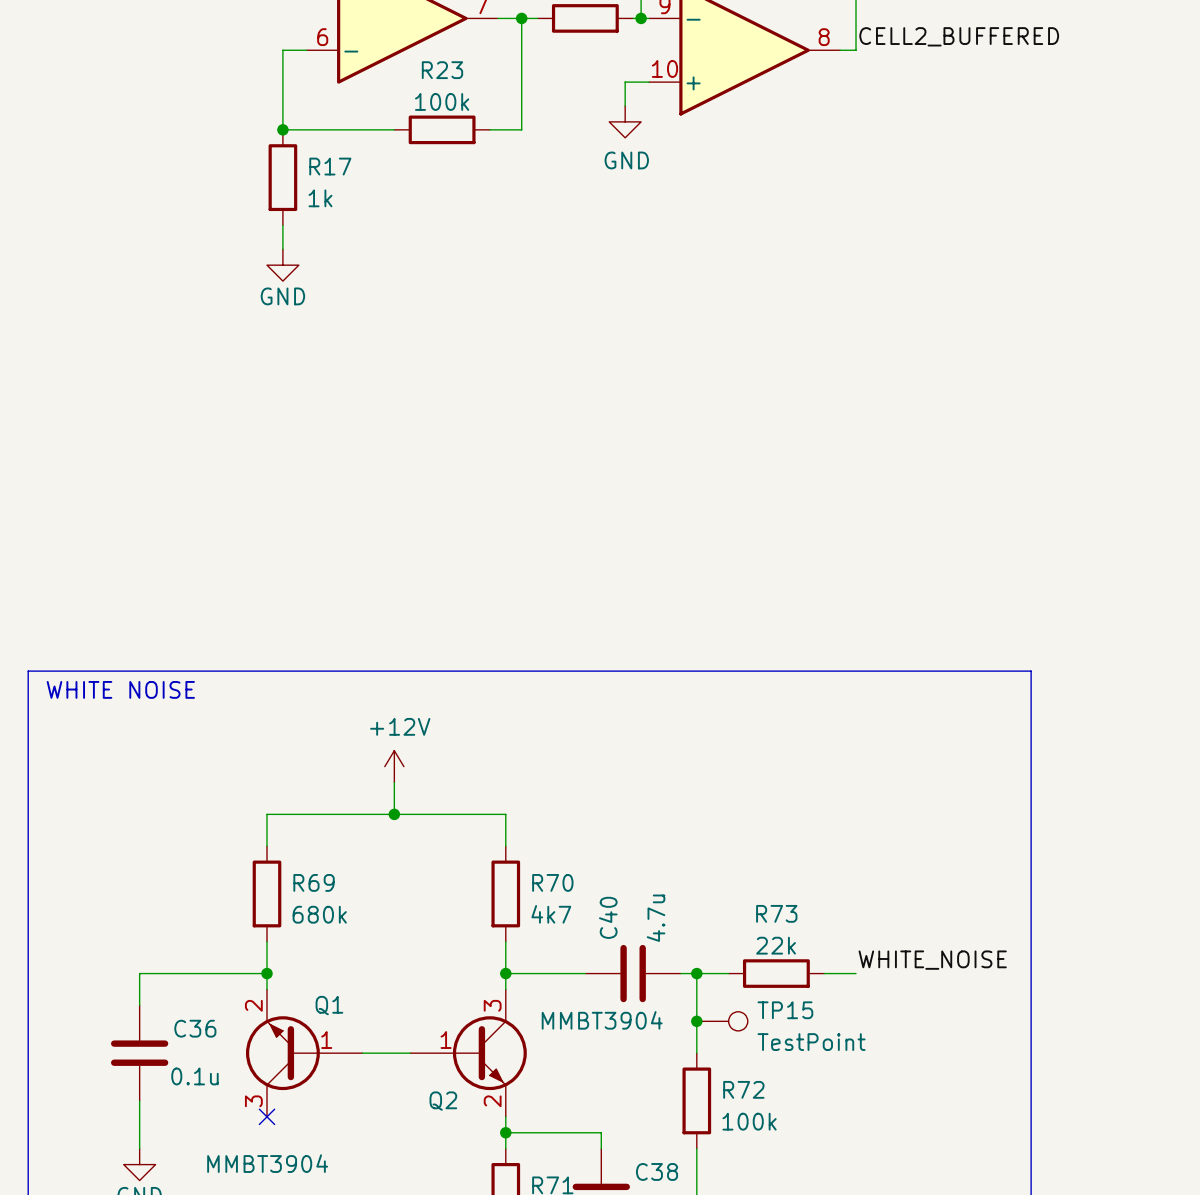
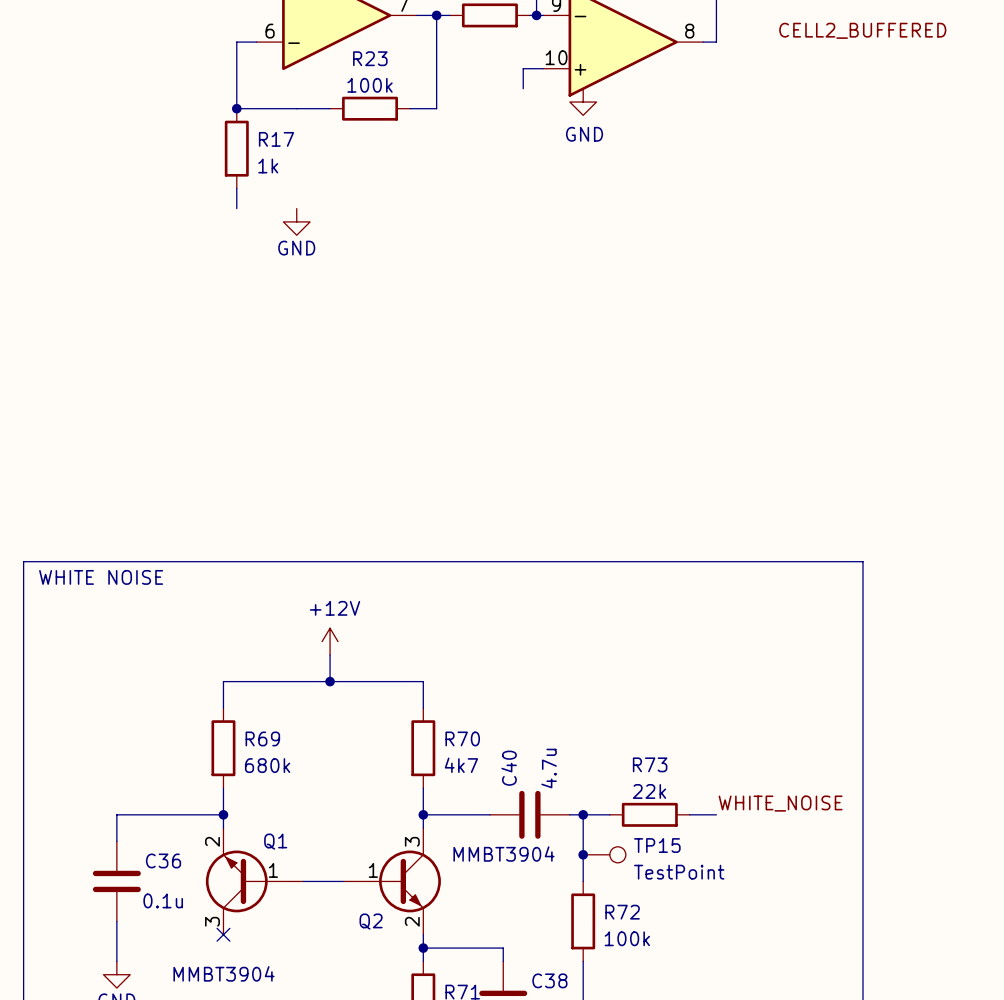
label position: CELL2_BUFFERED (959, 36) -> CELL2_BUFFERED (862, 30)
power symbol position: GND (625, 121) -> GND (583, 102)
power symbol position: GND (282, 265) -> GND (296, 221)

